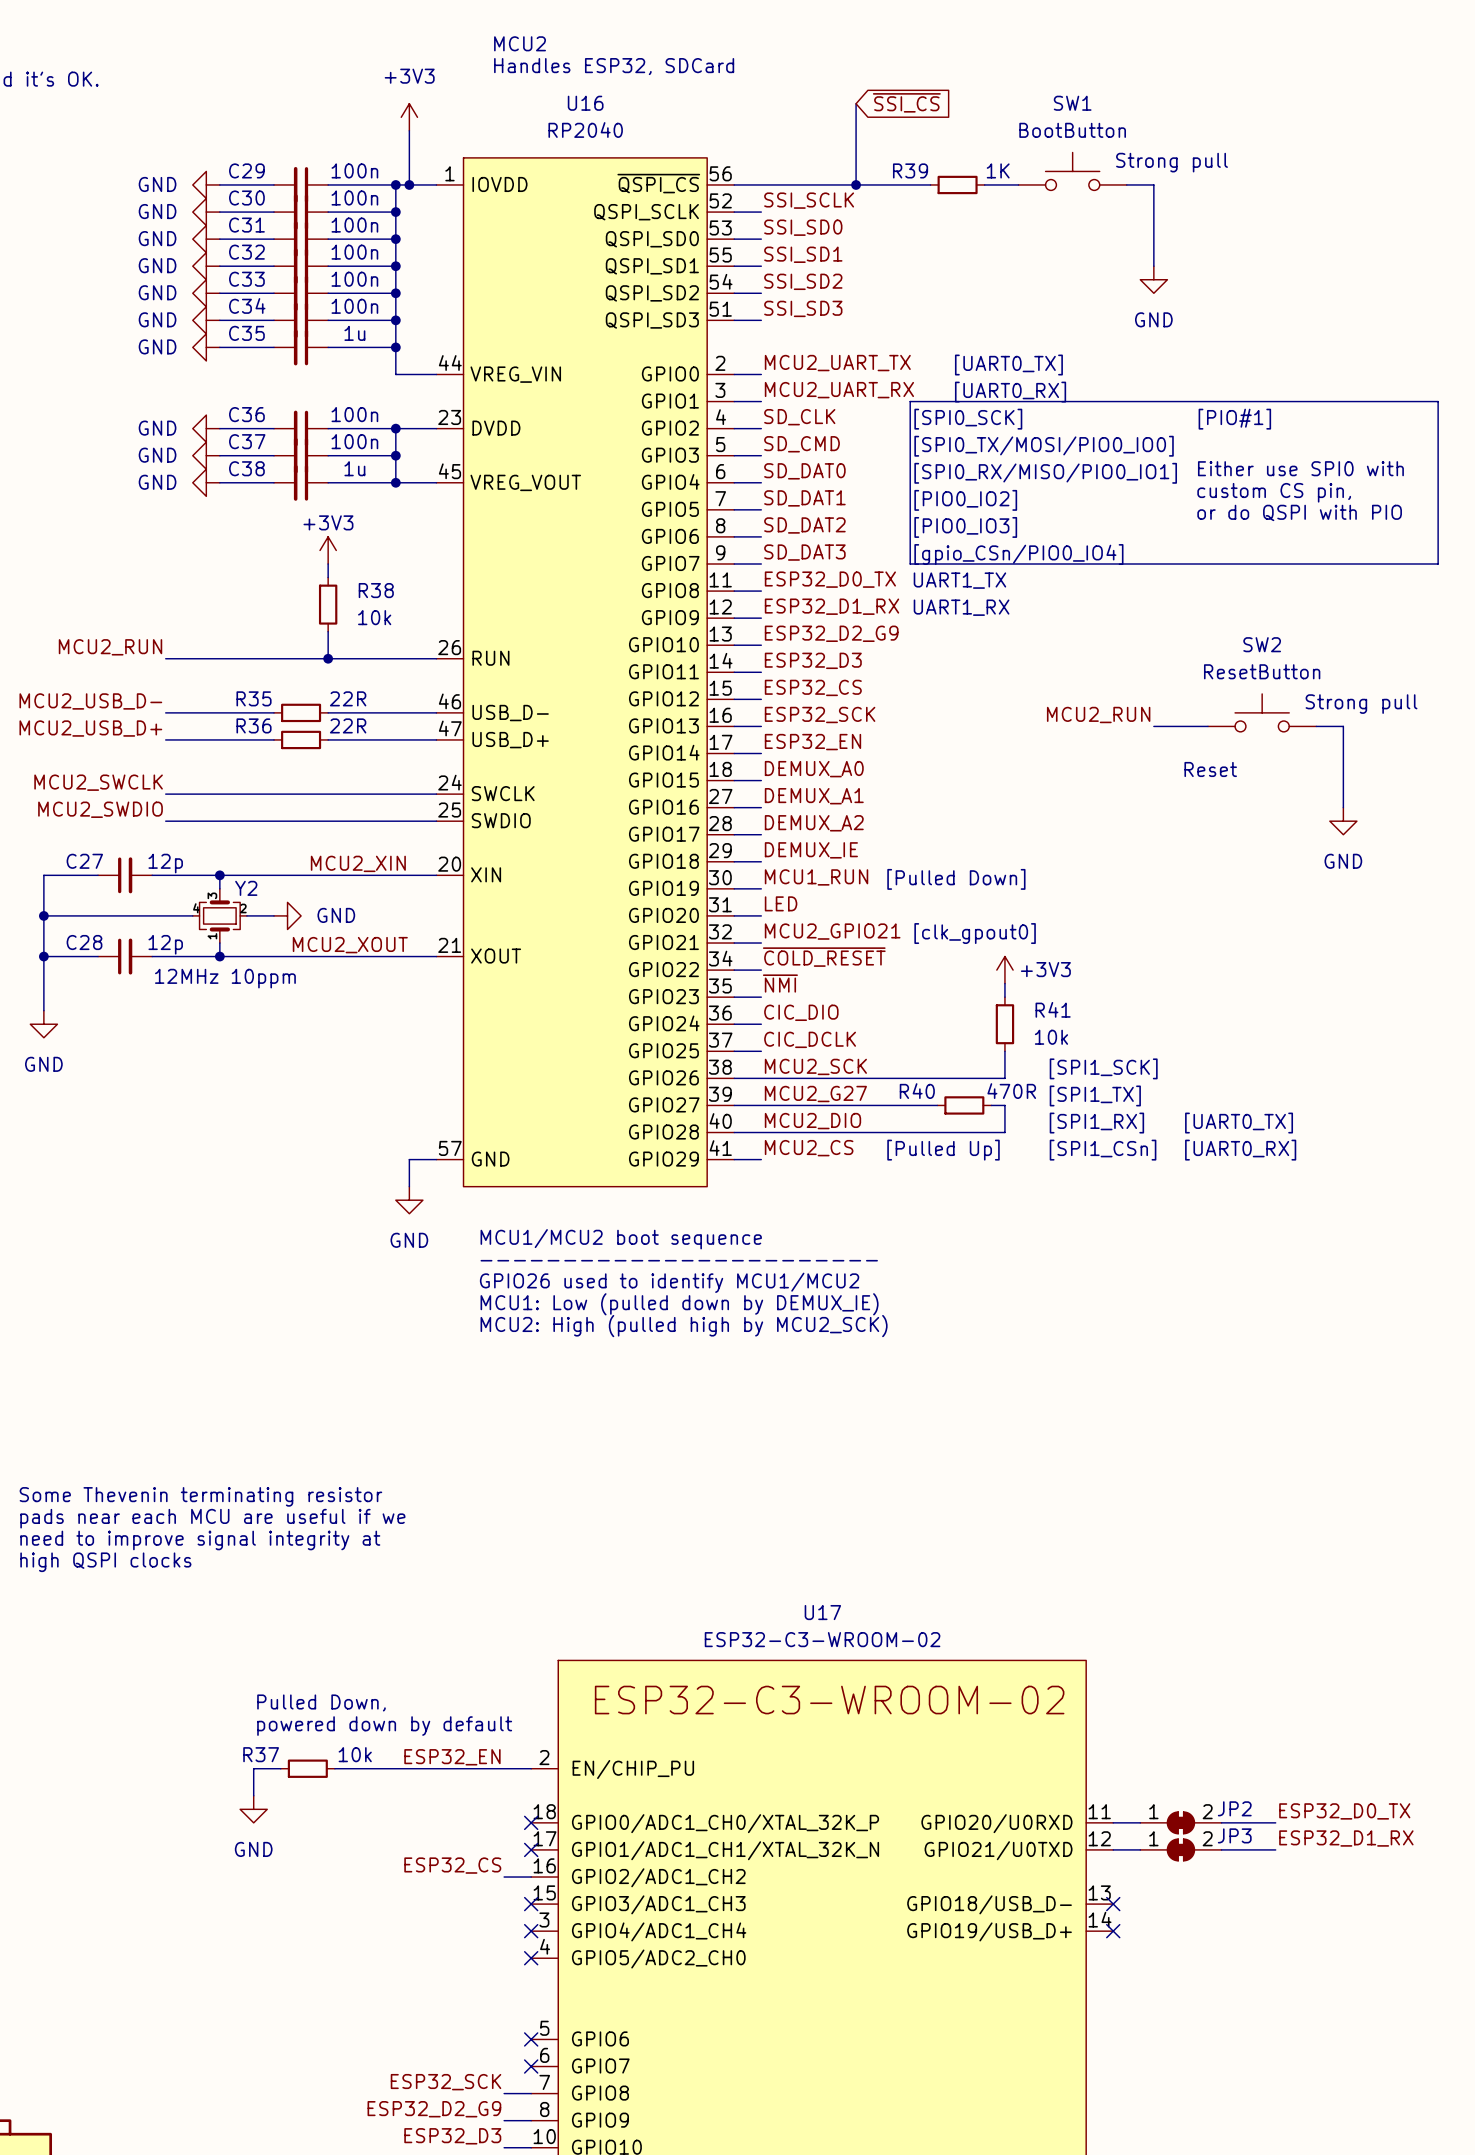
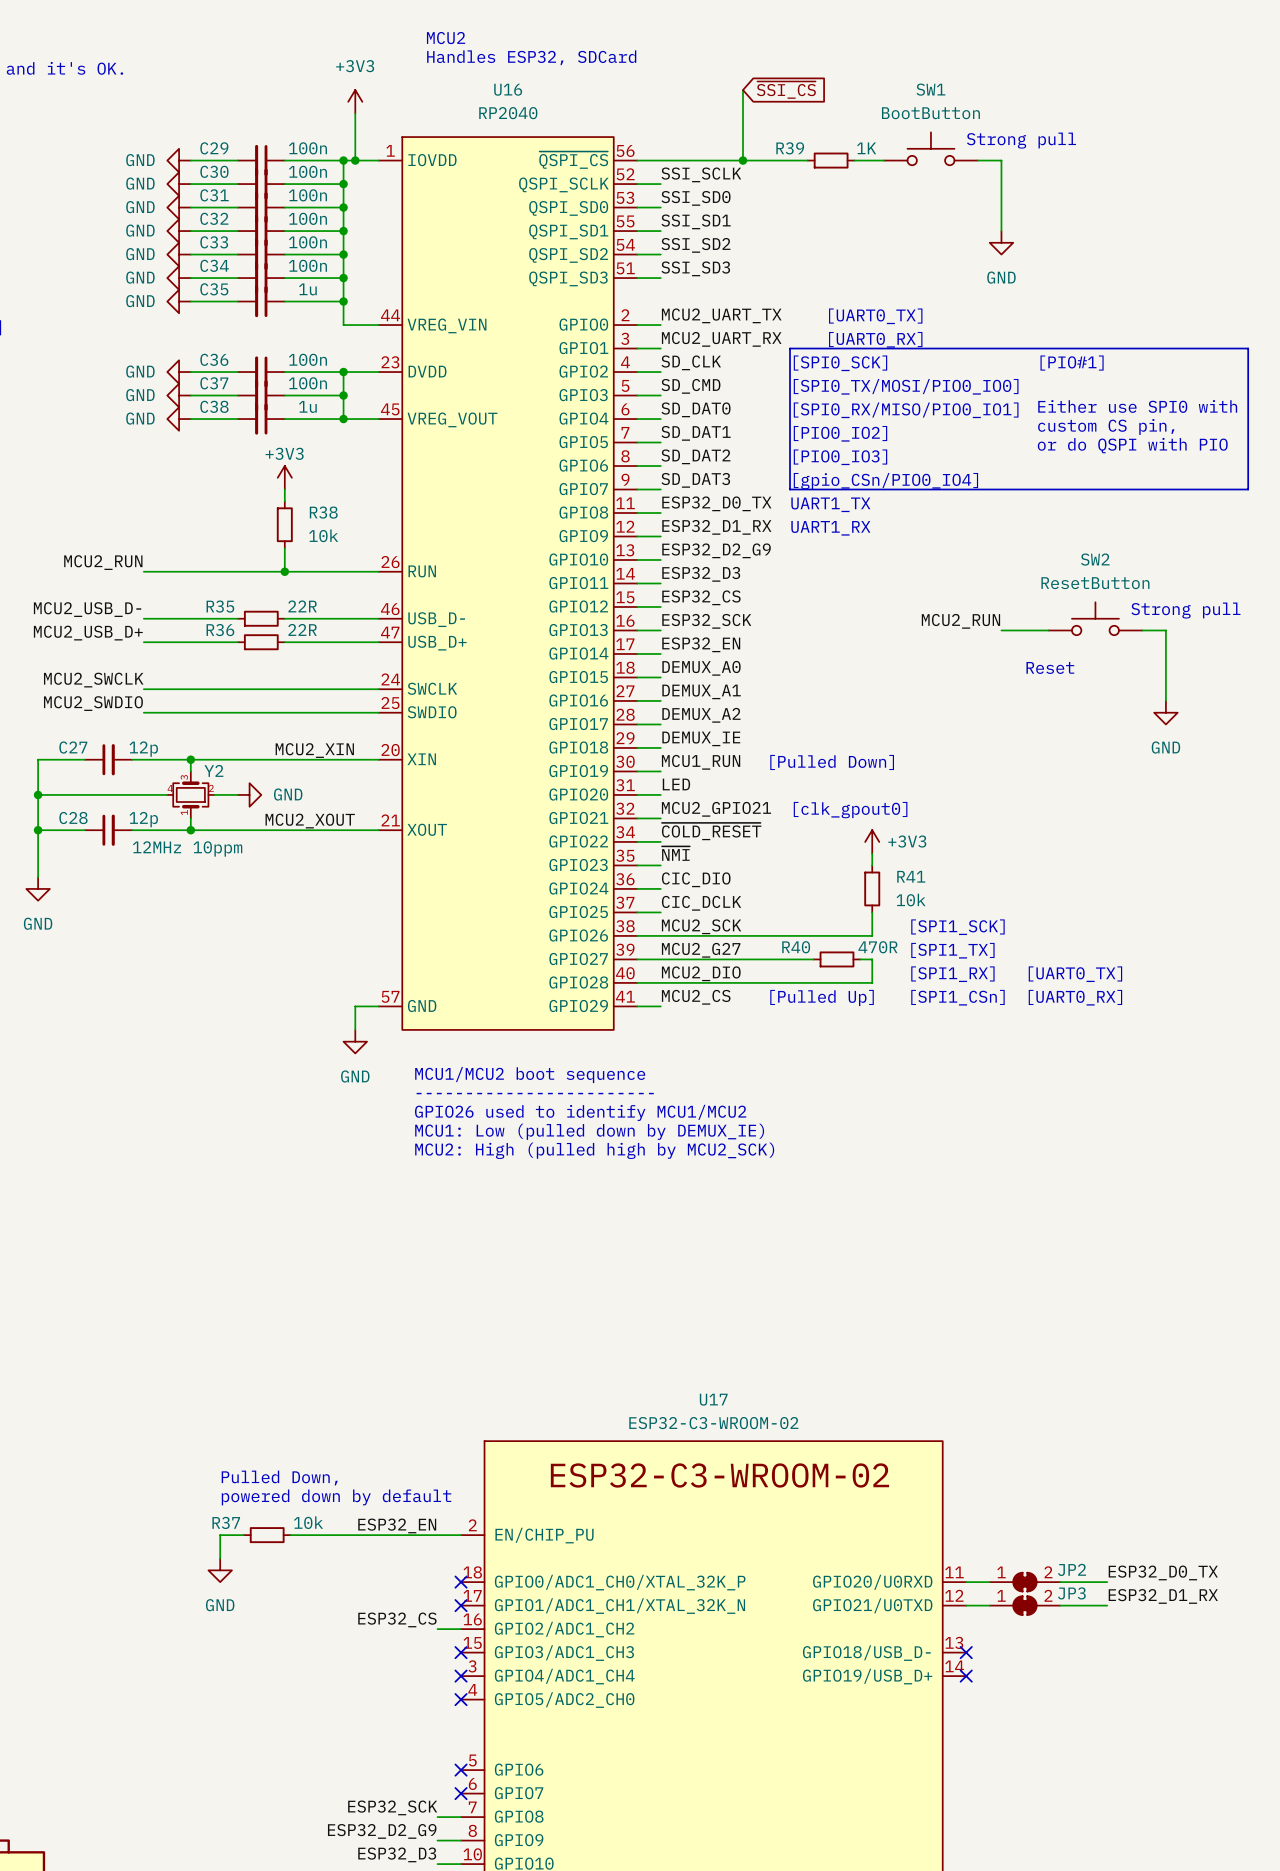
text: Some Thevenin terminating resistor (200, 1496) -> none
text: pads near each MCU are useful if we (212, 1518) -> none
text: need to improve signal integrity at (200, 1540) -> none
text: high QSPI clocks (105, 1562) -> none

